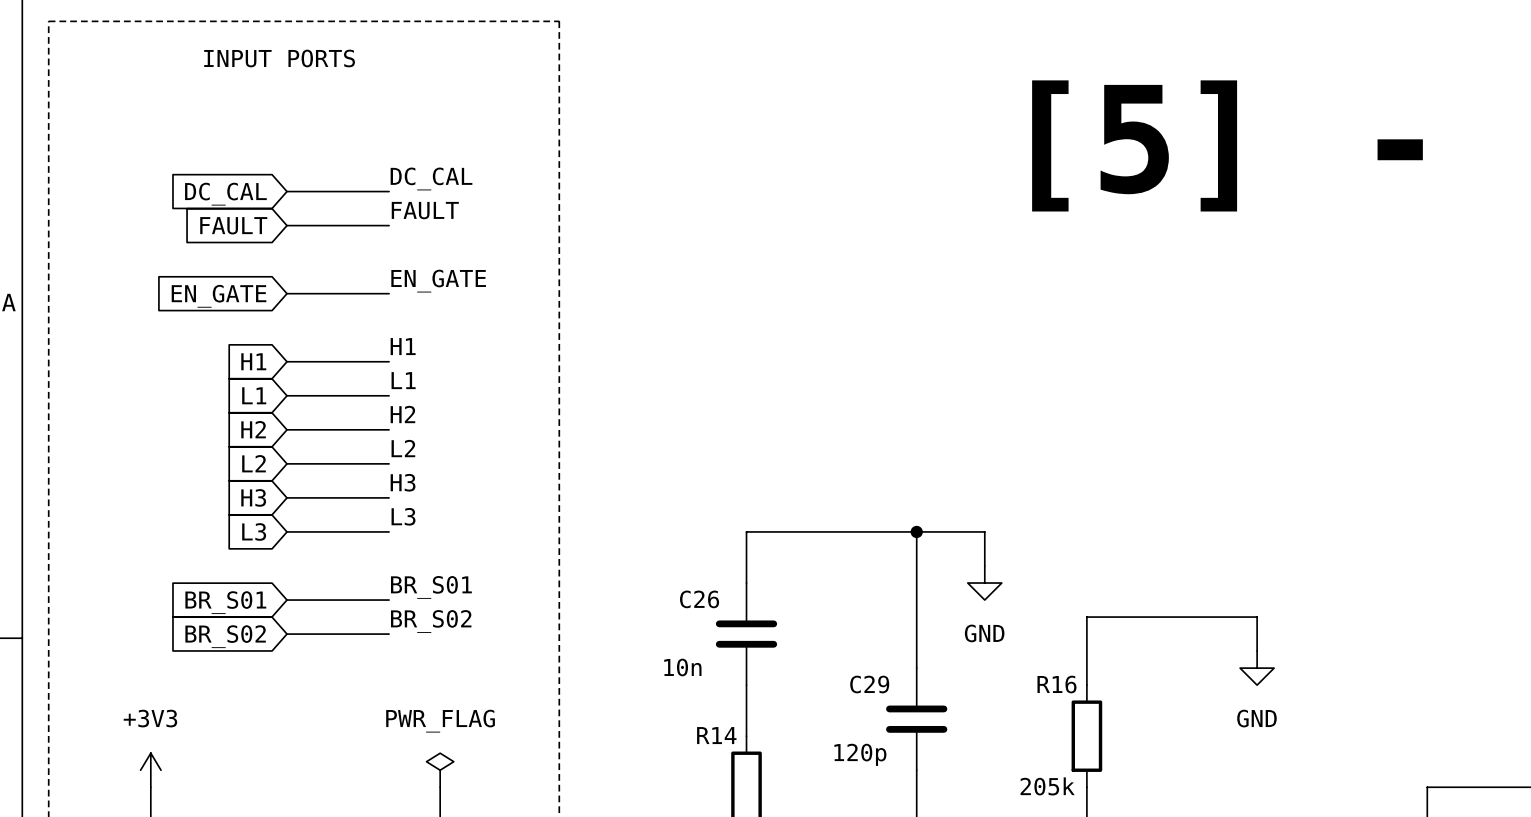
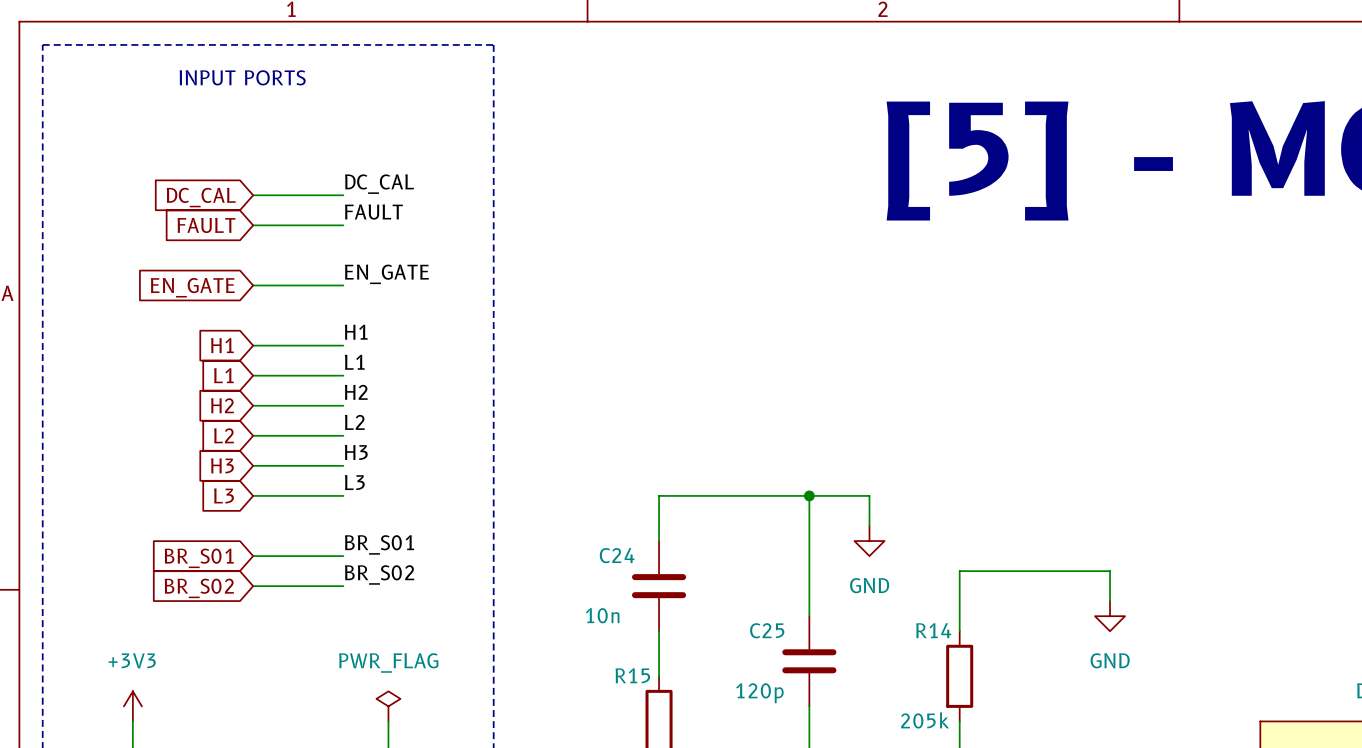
C26 name: C26 (699, 599) -> C24 (617, 555)
C29 name: C29 (869, 684) -> C25 (767, 630)
R16 name: R16 (1056, 684) -> R14 (933, 630)
R14 name: R14 (716, 735) -> R15 (632, 675)

